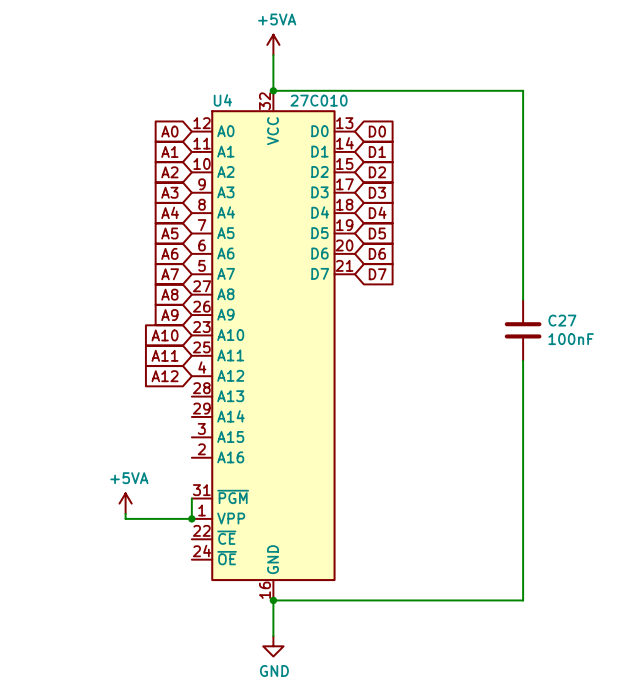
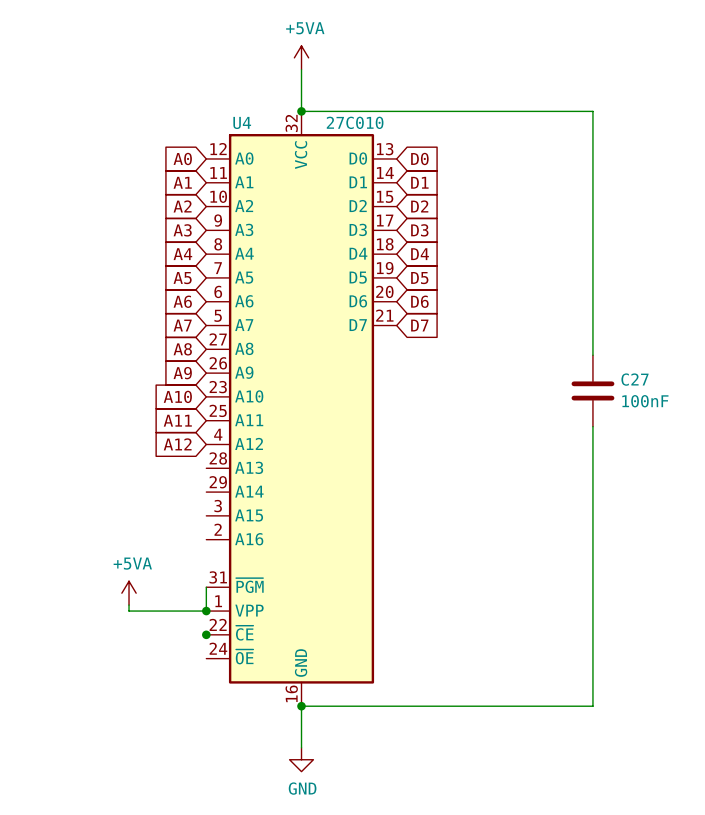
junction: none -> (206, 634)

